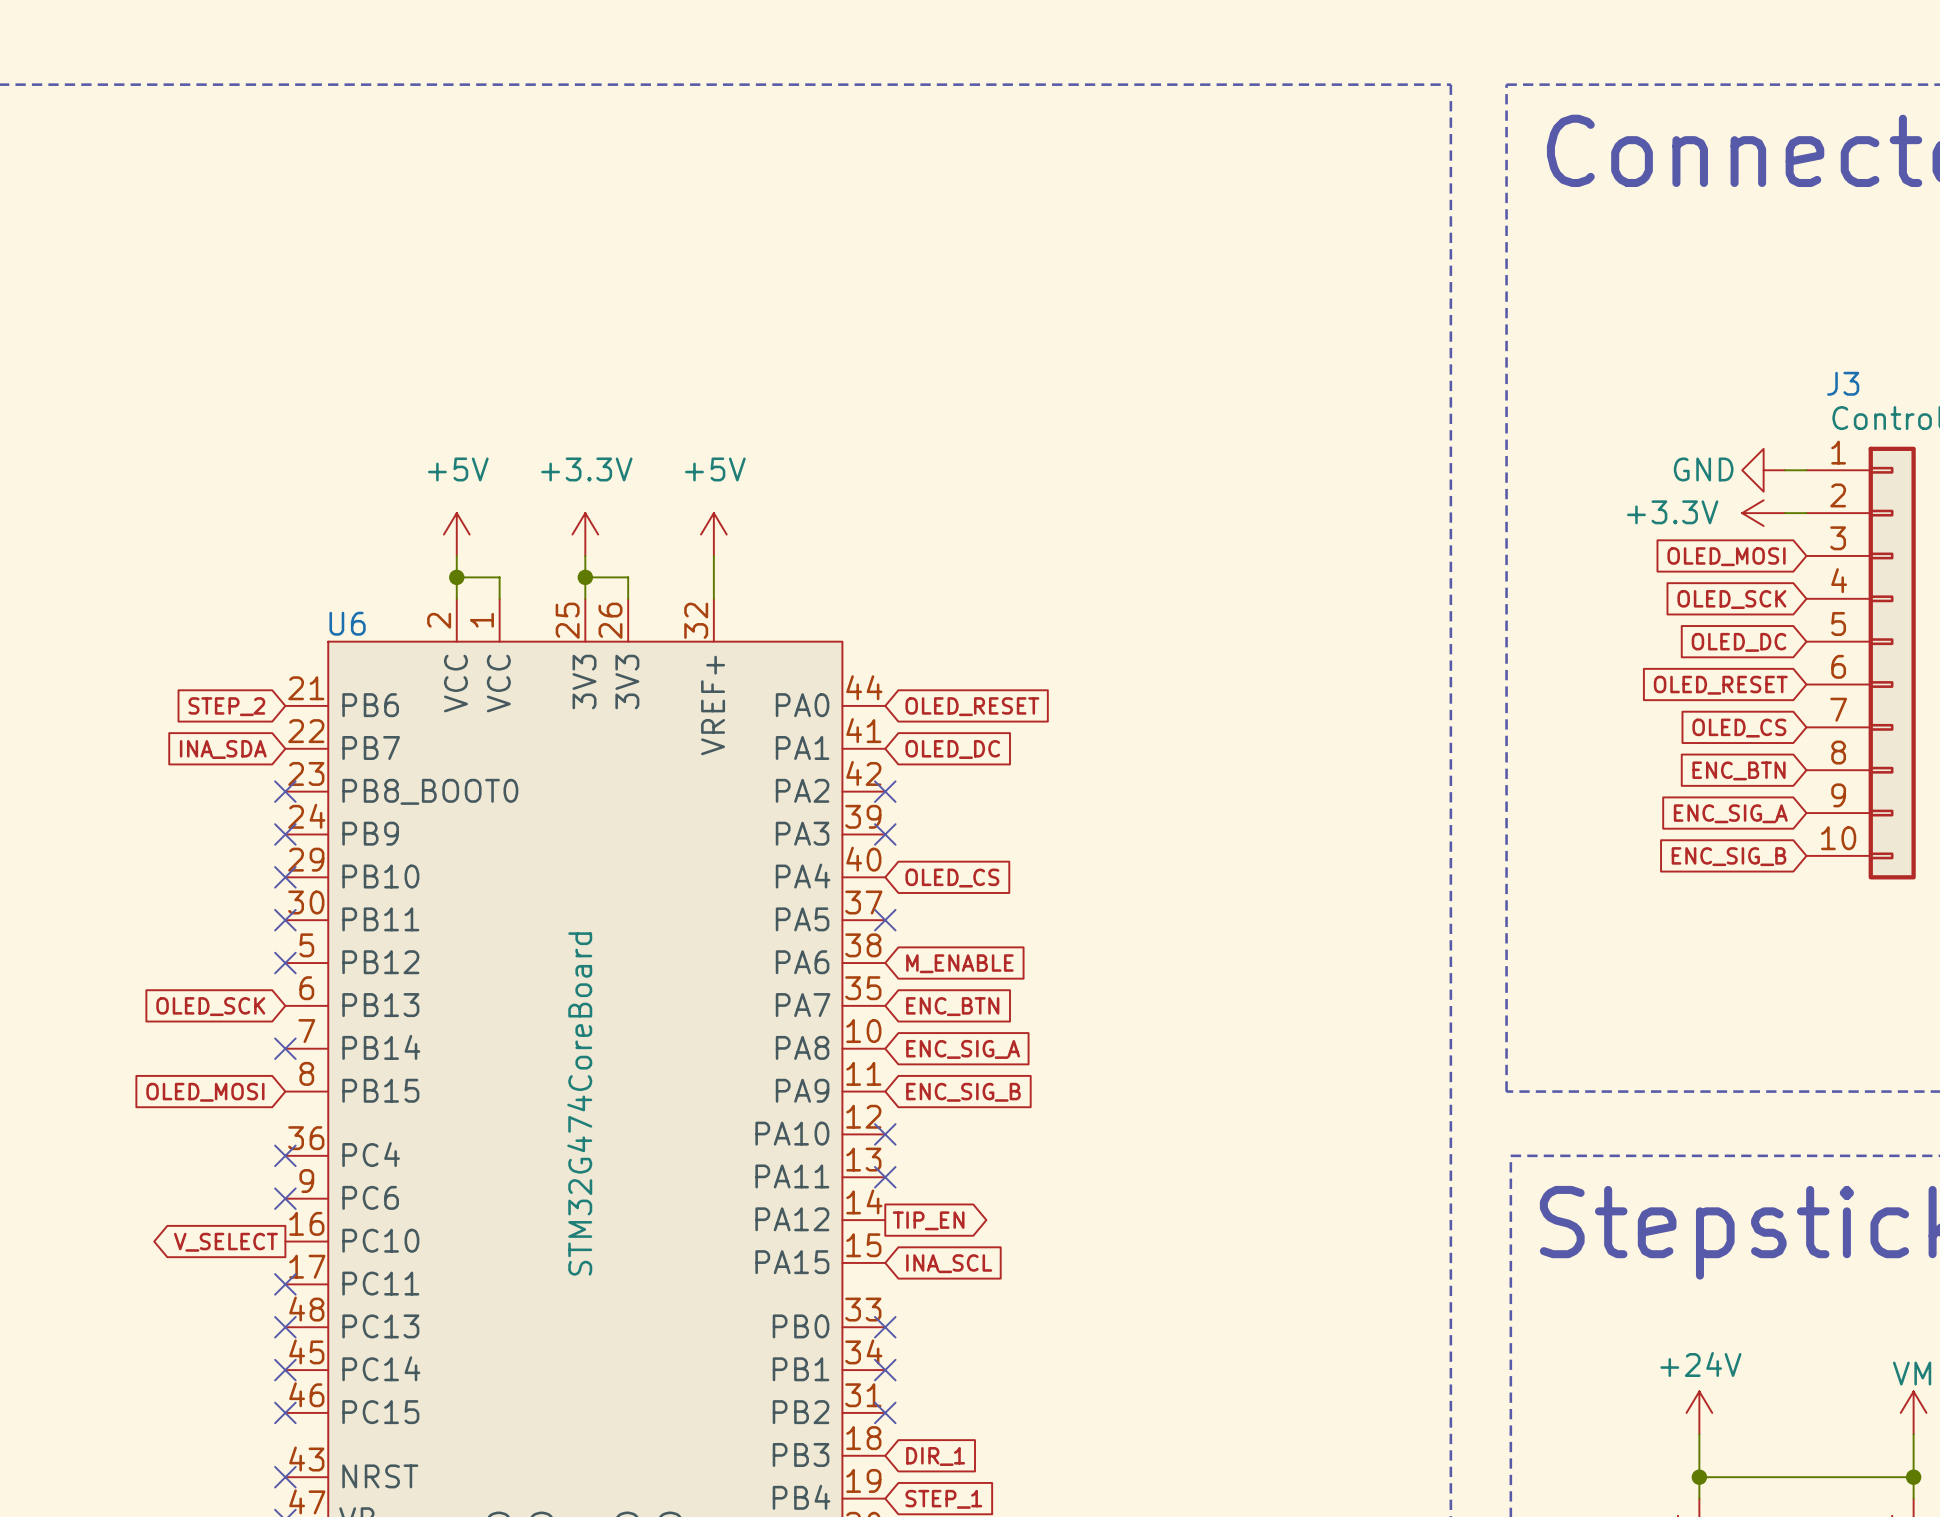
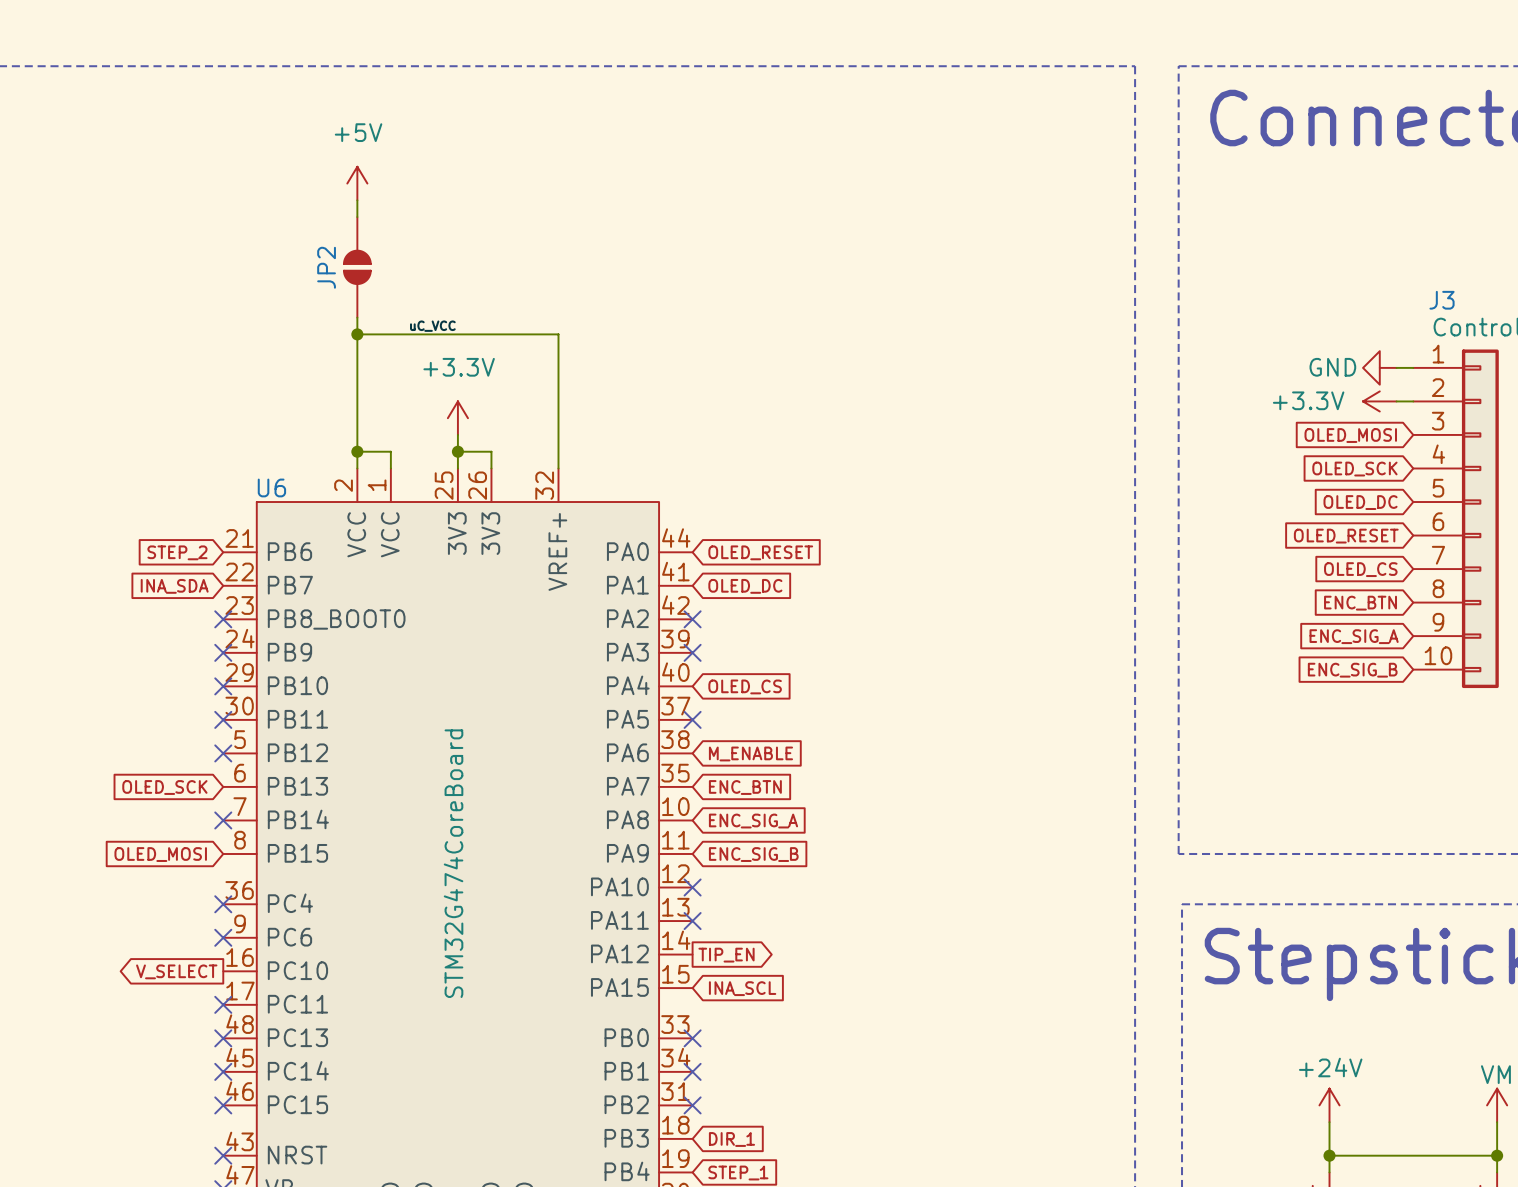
power symbol: none -> +5V (357, 183)
wire: none -> (357, 200) (357, 217)
JP2: none -> (357, 267)
wire: none -> (357, 317) (357, 434)
label: none -> uC_VCC (432, 326)
wire: none -> (357, 334) (558, 334) (558, 434)
junction: none -> (357, 334)
power symbol: +5V (456, 534) -> none
power symbol: +5V (713, 534) -> none

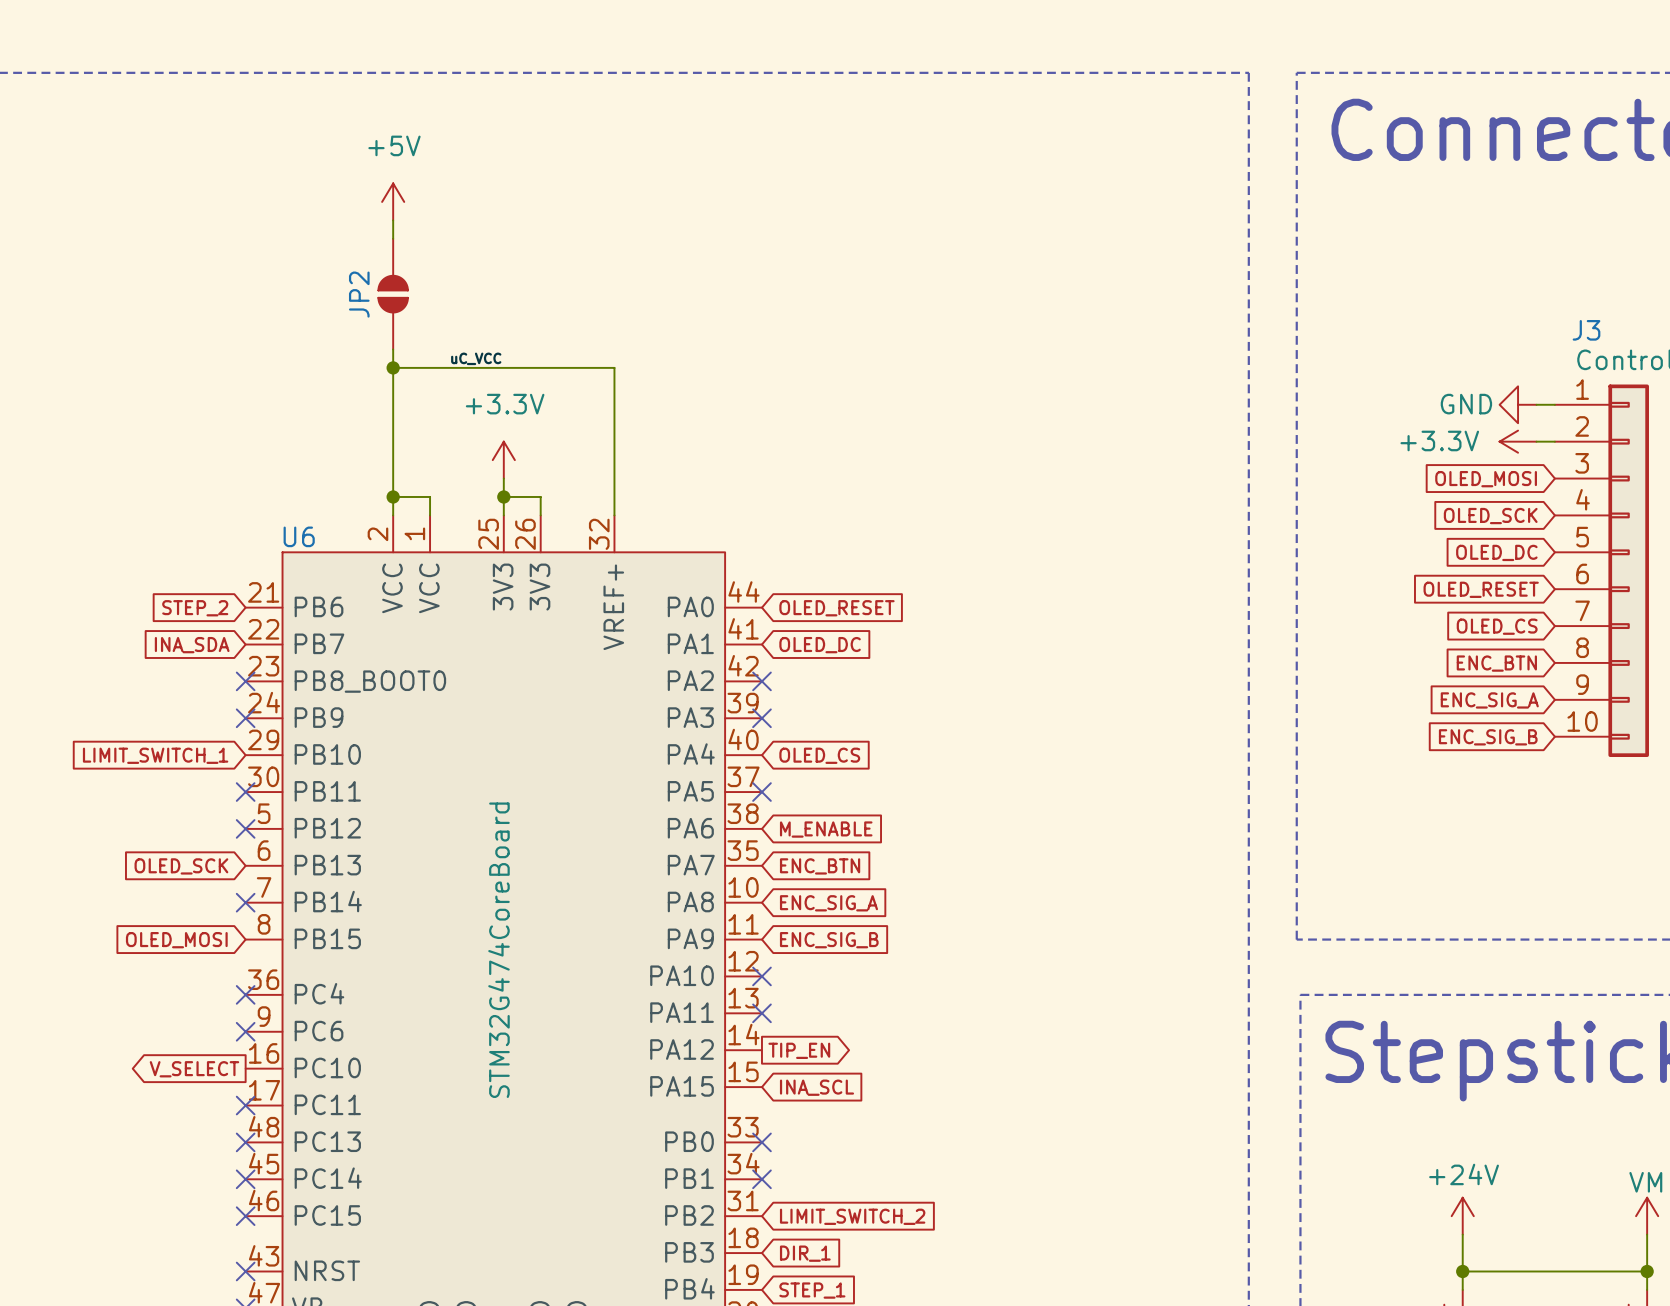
global label: none -> LIMIT_SWITCH_1 (155, 755)
no-connect mark: (223, 686) -> none
no-connect mark: (692, 1105) -> none
global label: none -> LIMIT_SWITCH_2 (852, 1216)

